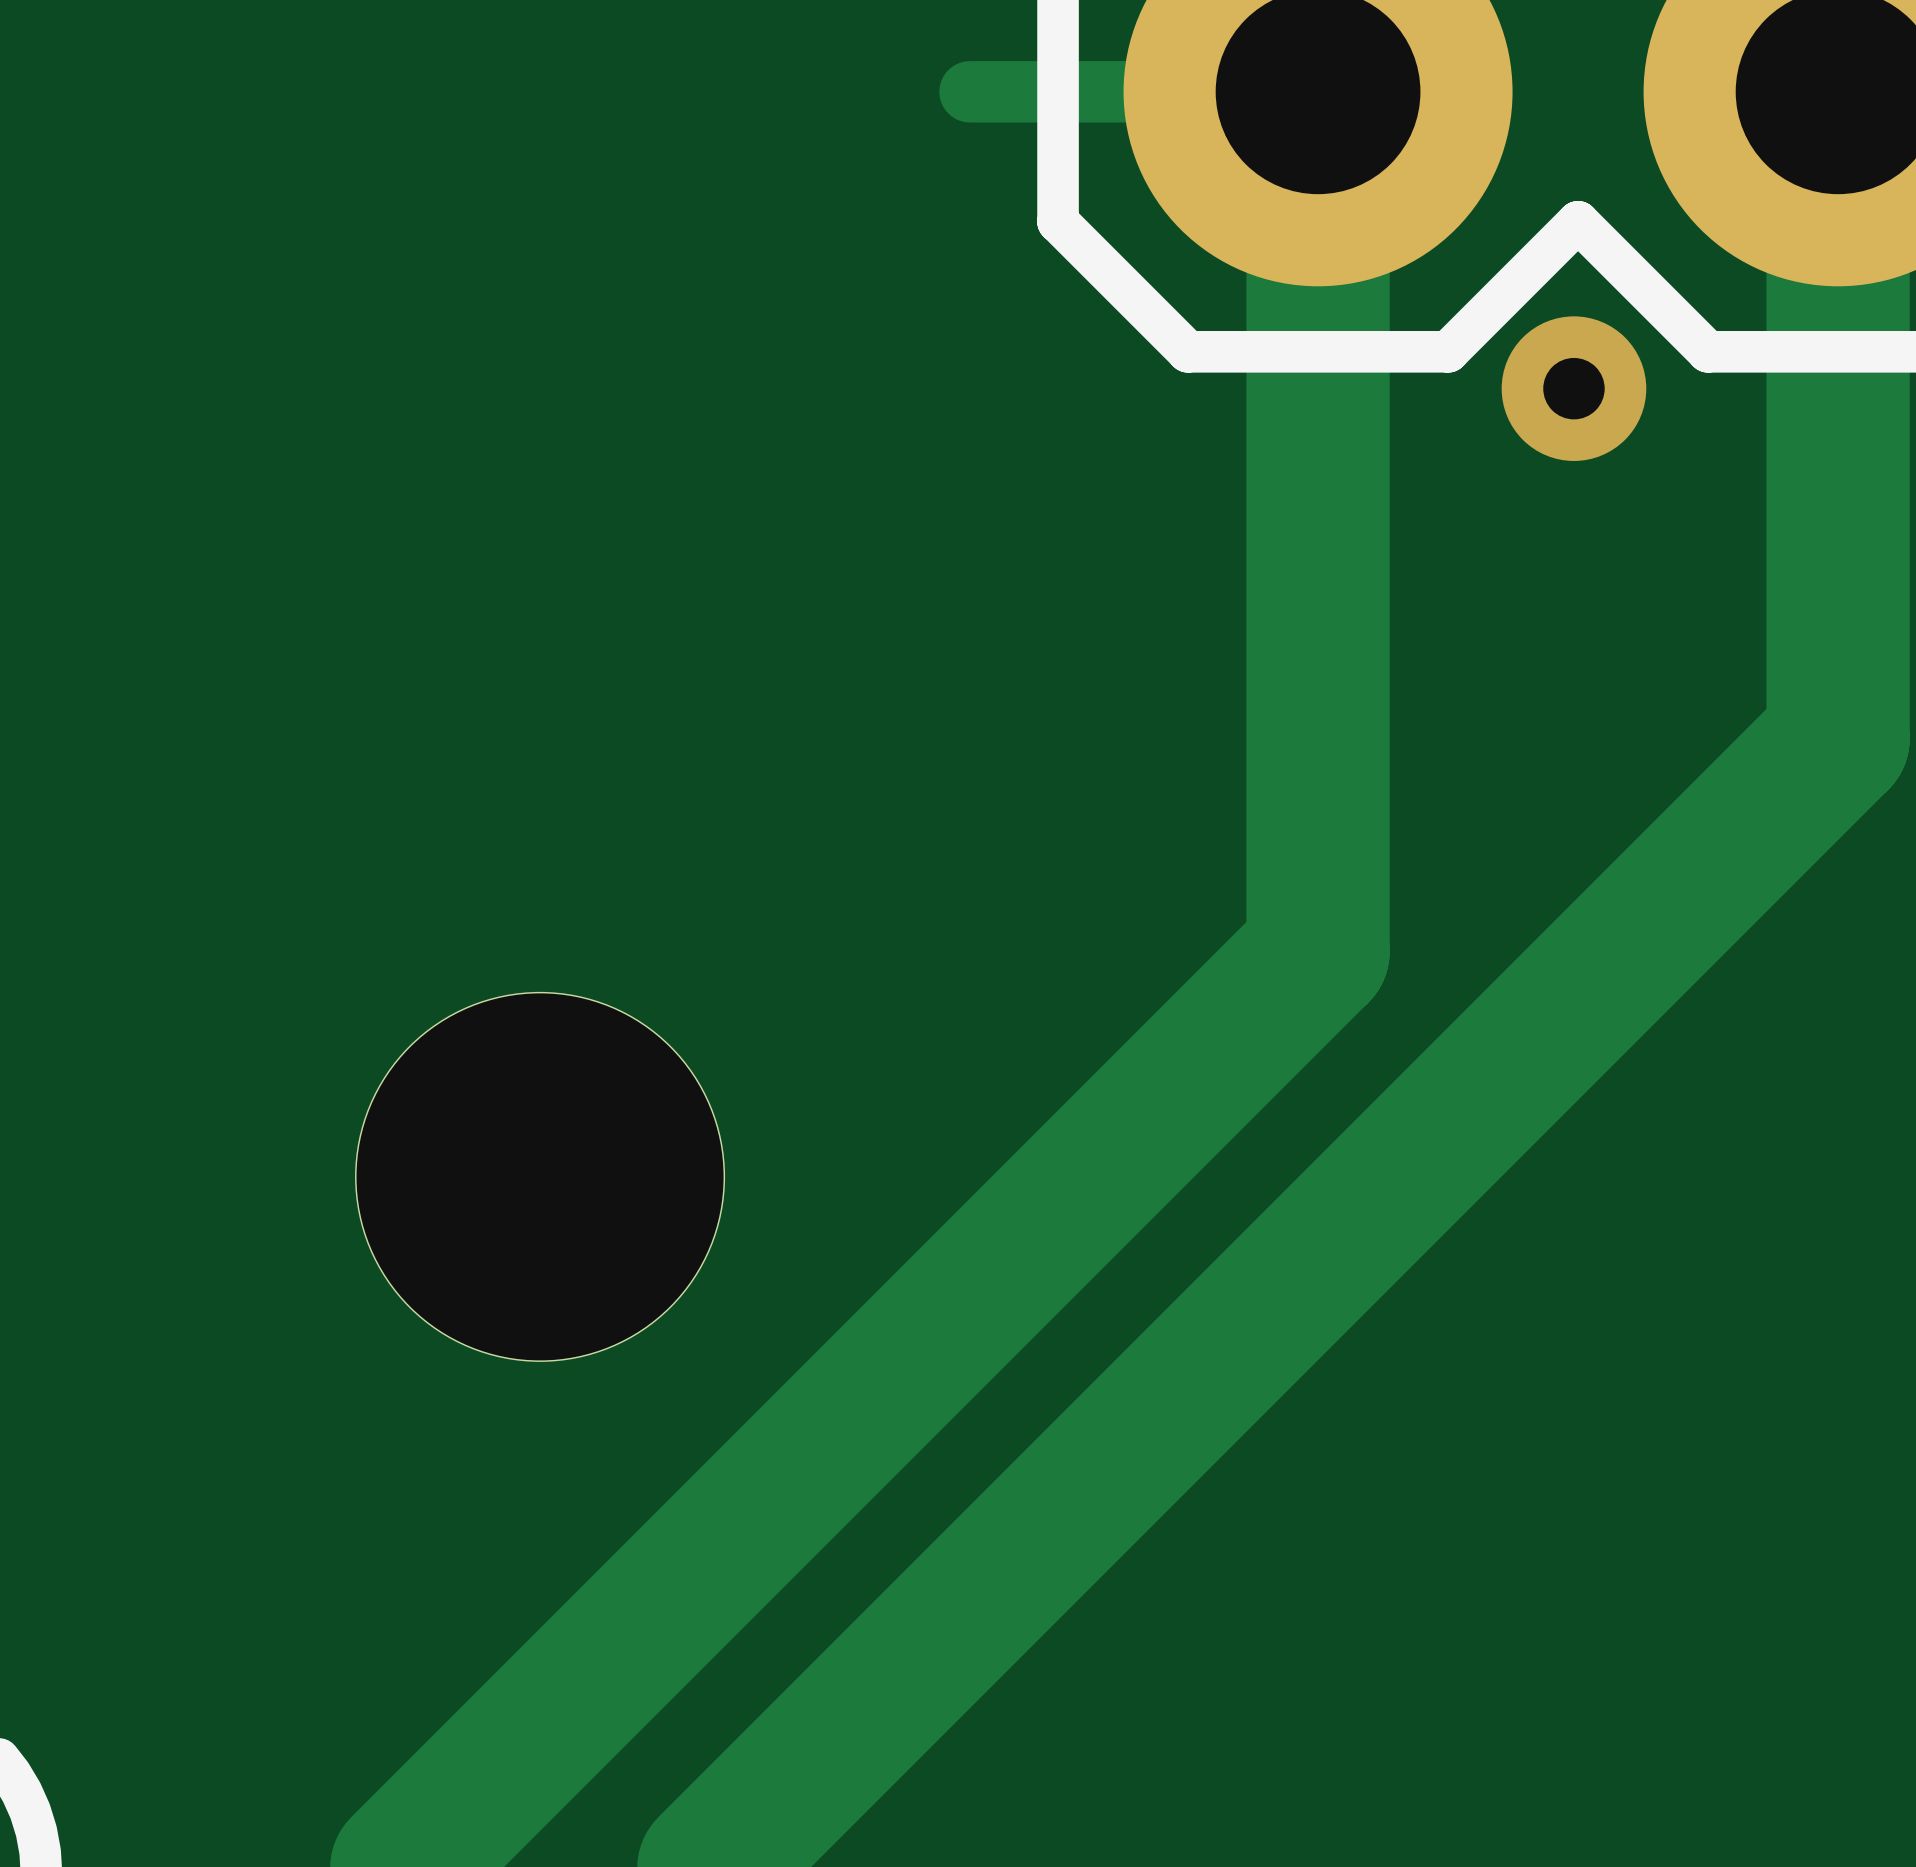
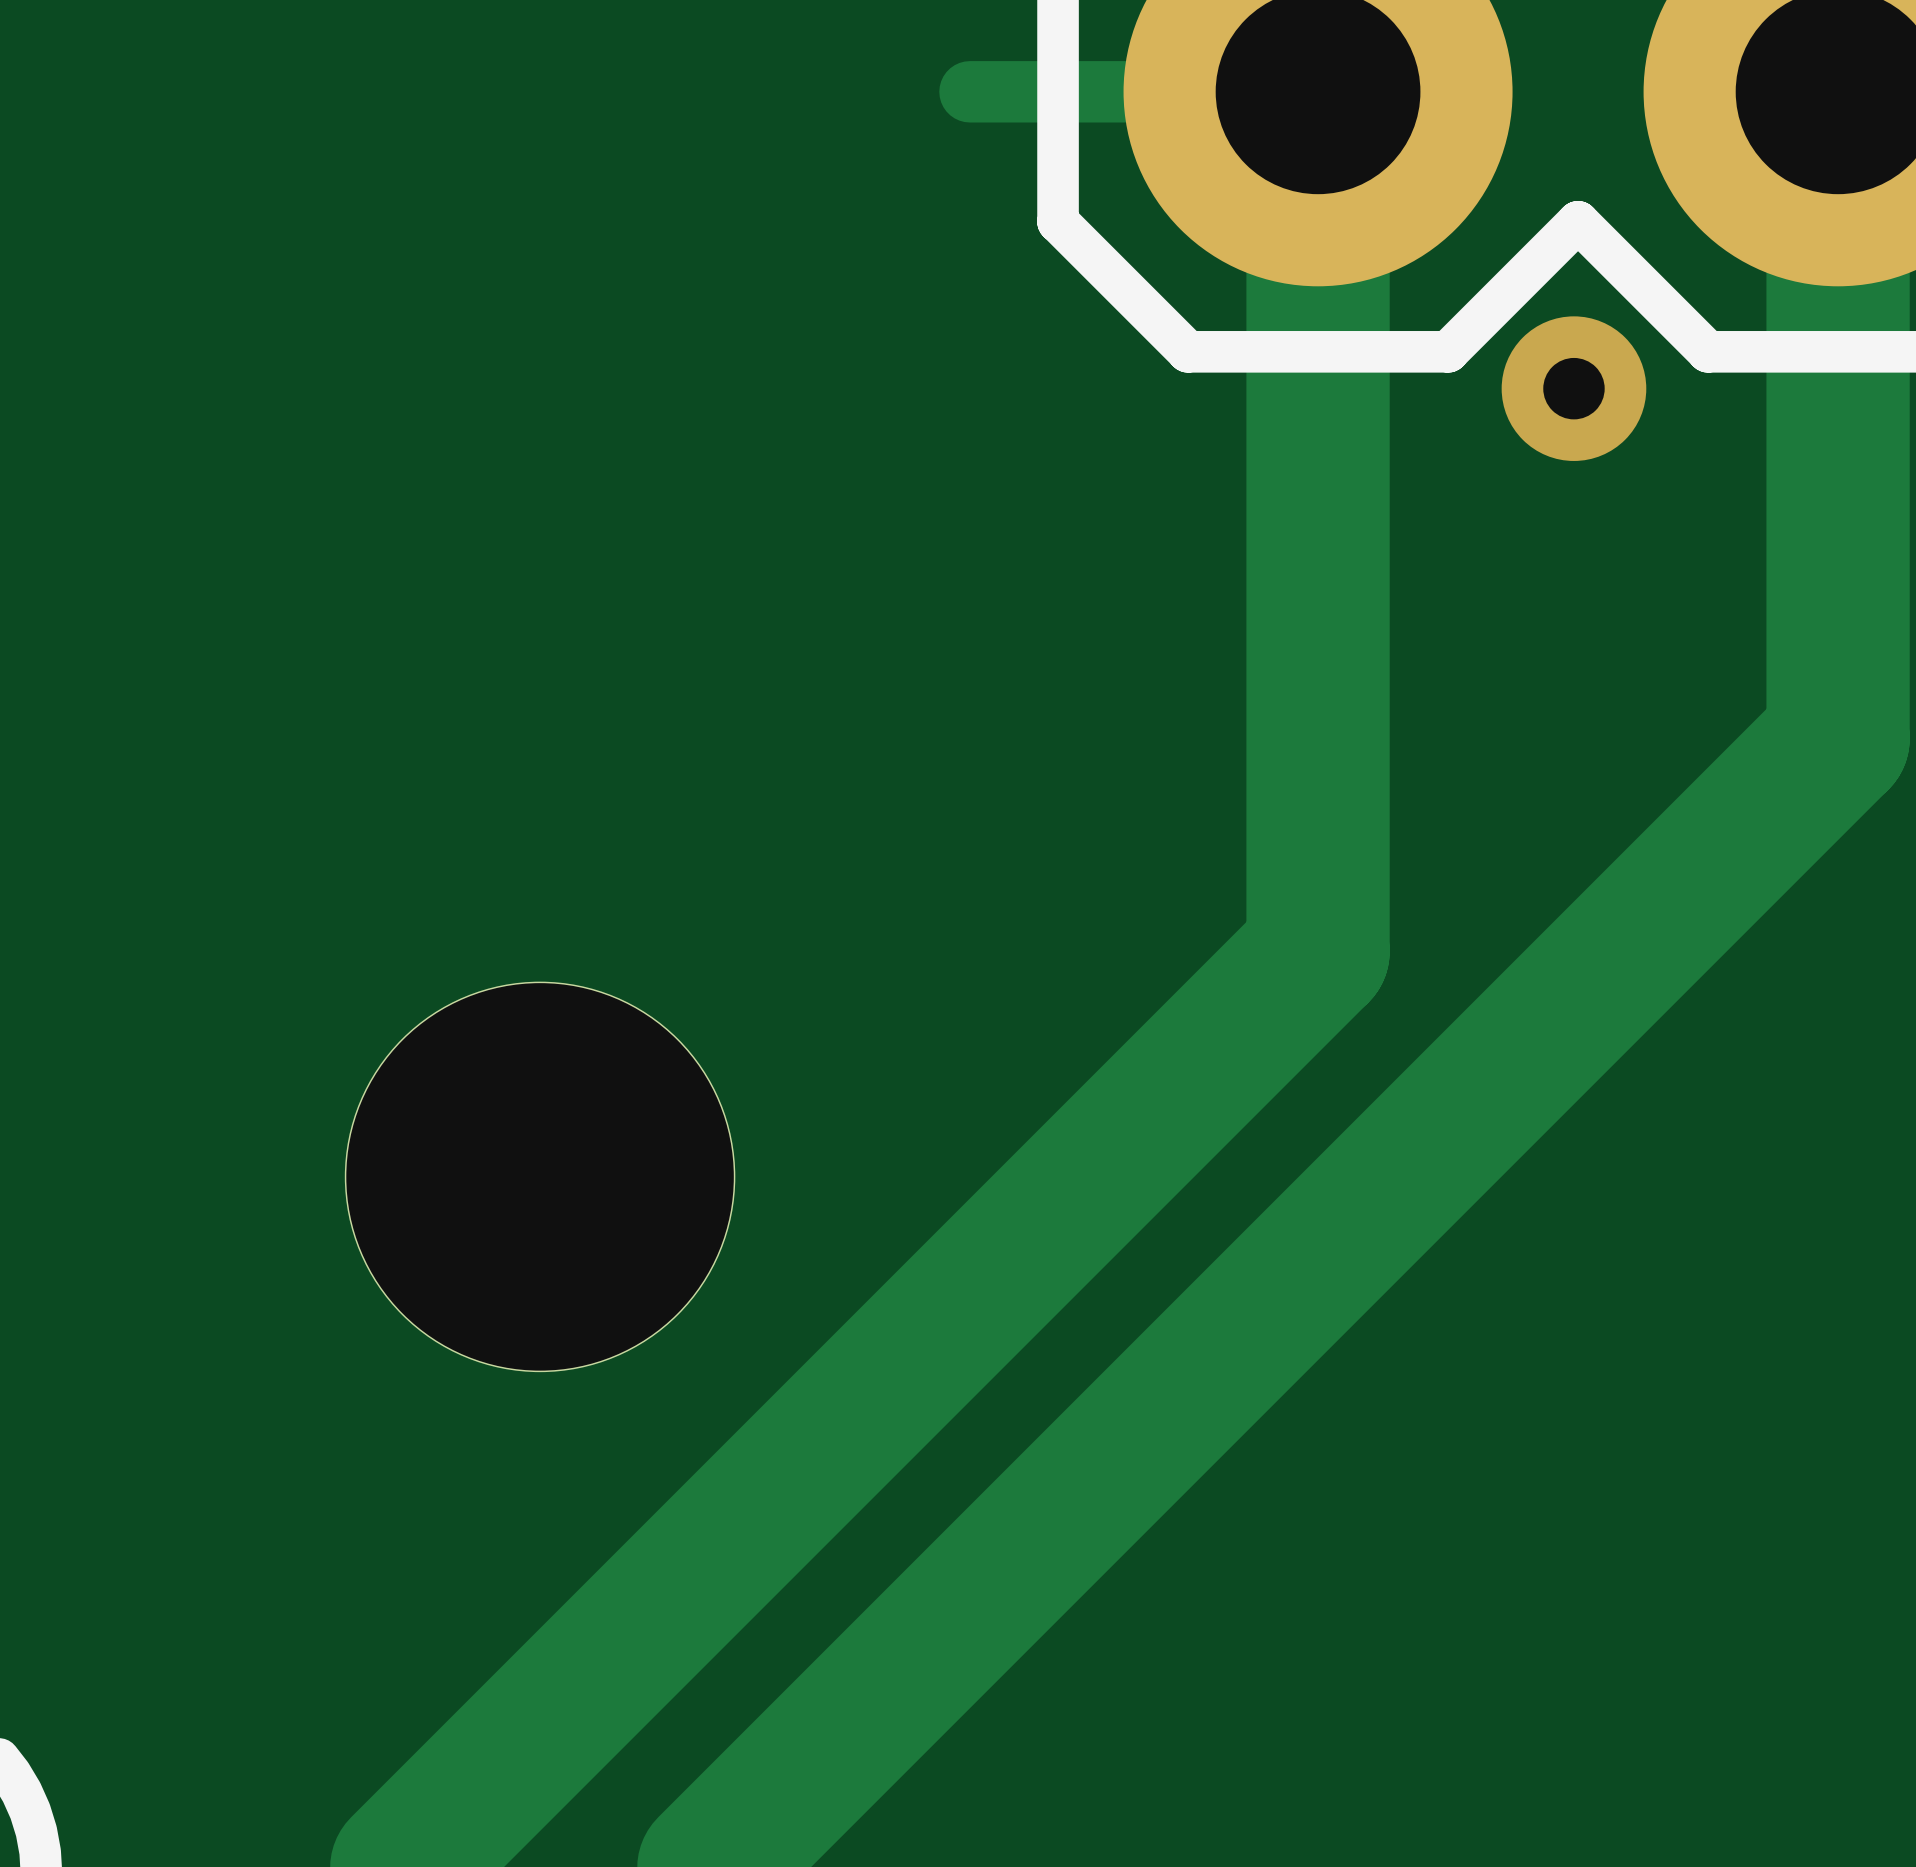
hole size: [355, 992, 725, 1362] -> [345, 982, 735, 1372]

